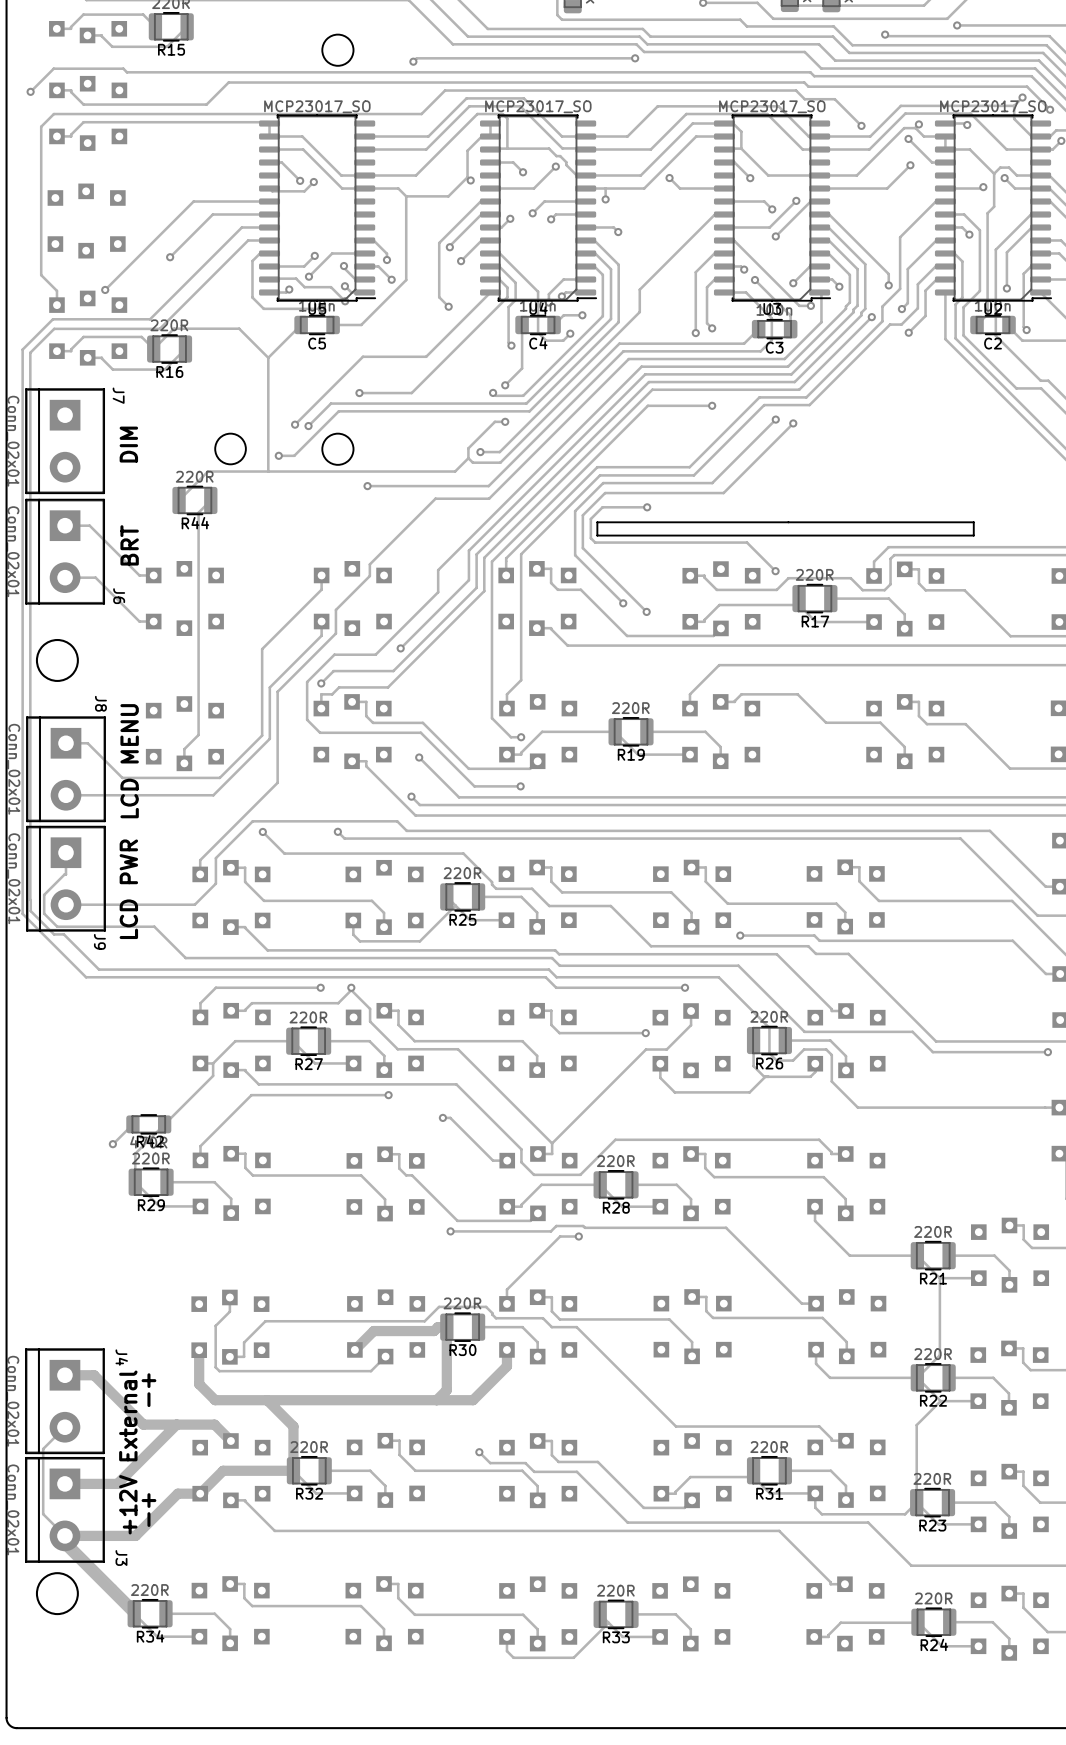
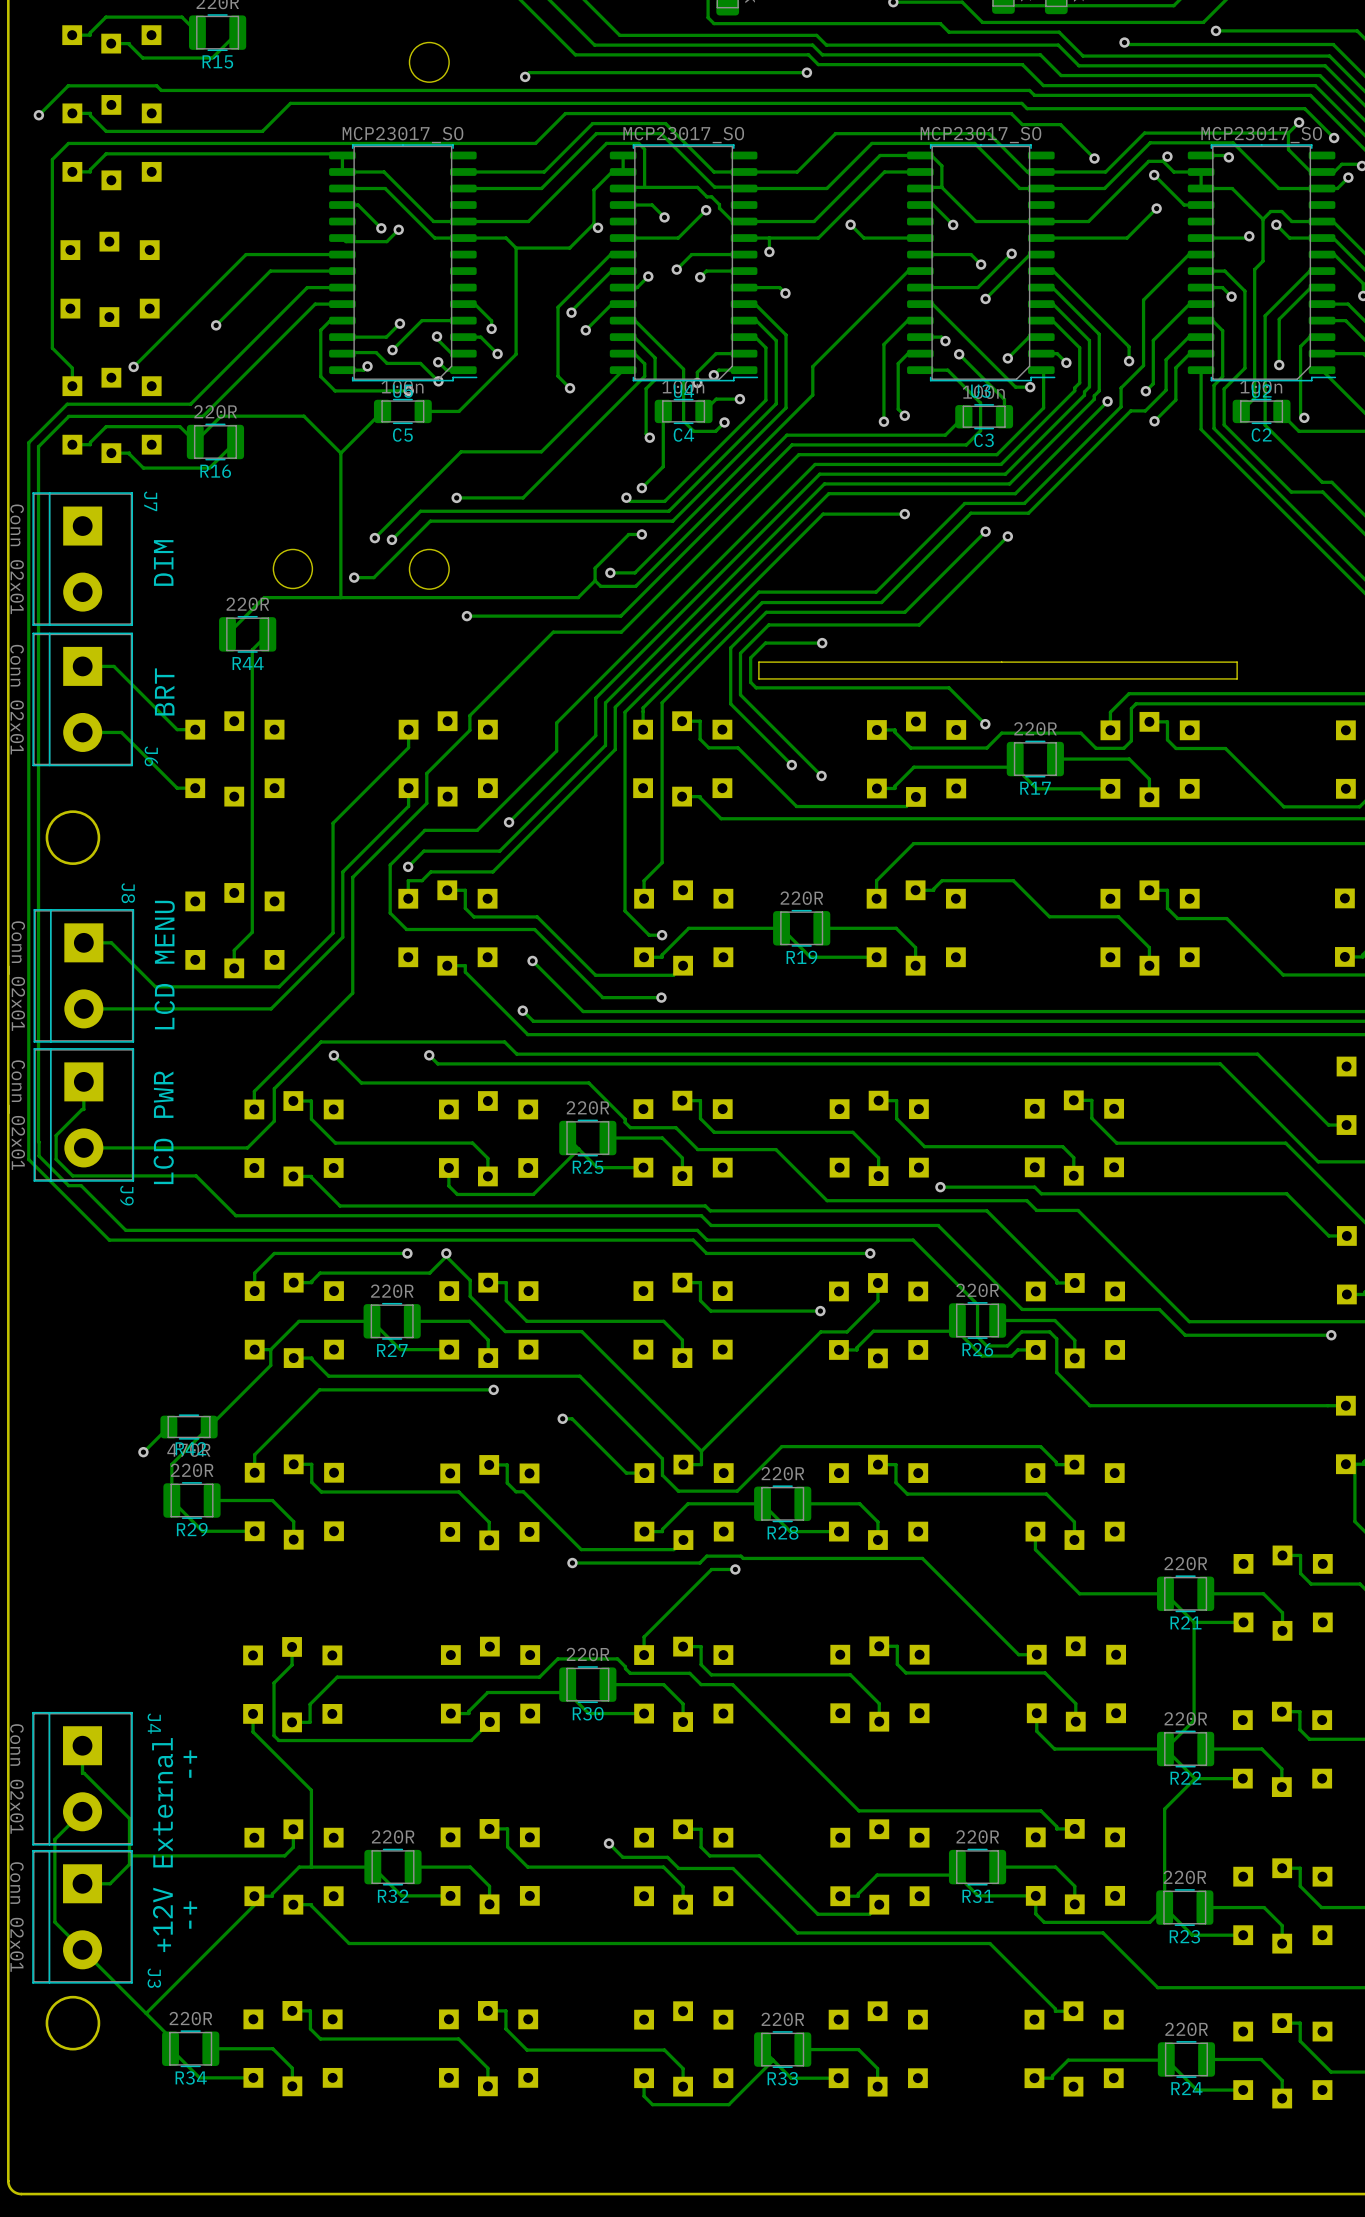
track: (753, 1048) (753, 1066) (764, 1076) (810, 1076) (815, 1072) (815, 1063) -> none
track: (660, 1063) (660, 1077) (674, 1092) (749, 1092) (765, 1076) -> (838, 1349) (856, 1349) (873, 1331) (957, 1331) (982, 1356) (1011, 1356) (1017, 1349) (1035, 1349)
track: (446, 1327) (438, 1327) (434, 1331) (373, 1331) (354, 1349) -> (644, 1713) (588, 1713) (567, 1692) (487, 1692) (468, 1711) (468, 1713) (450, 1713)
track: (446, 1333) (446, 1390) (436, 1400) -> none
track: (506, 1349) (506, 1366) (473, 1400) (215, 1400) (199, 1384) (199, 1350) -> none
track: none -> (253, 1731) (311, 1790) (311, 1867)
track: none -> (82, 1745) (82, 1773) (129, 1818) (129, 1864) (110, 1883)
track: (83, 1375) (64, 1375) (94, 1375) (143, 1424) (214, 1424) (230, 1440) -> (129, 1855) (284, 1855) (293, 1847) (293, 1829)
track: (267, 1400) (293, 1426) (293, 1470) (223, 1470) (200, 1493) (177, 1493) (135, 1535) (64, 1535) (64, 1544) (134, 1613) -> none
track: (176, 1424) (117, 1483) (64, 1483) -> none
track: none -> (299, 1867) (272, 1893) (272, 1896) (263, 1896) (146, 2013)

